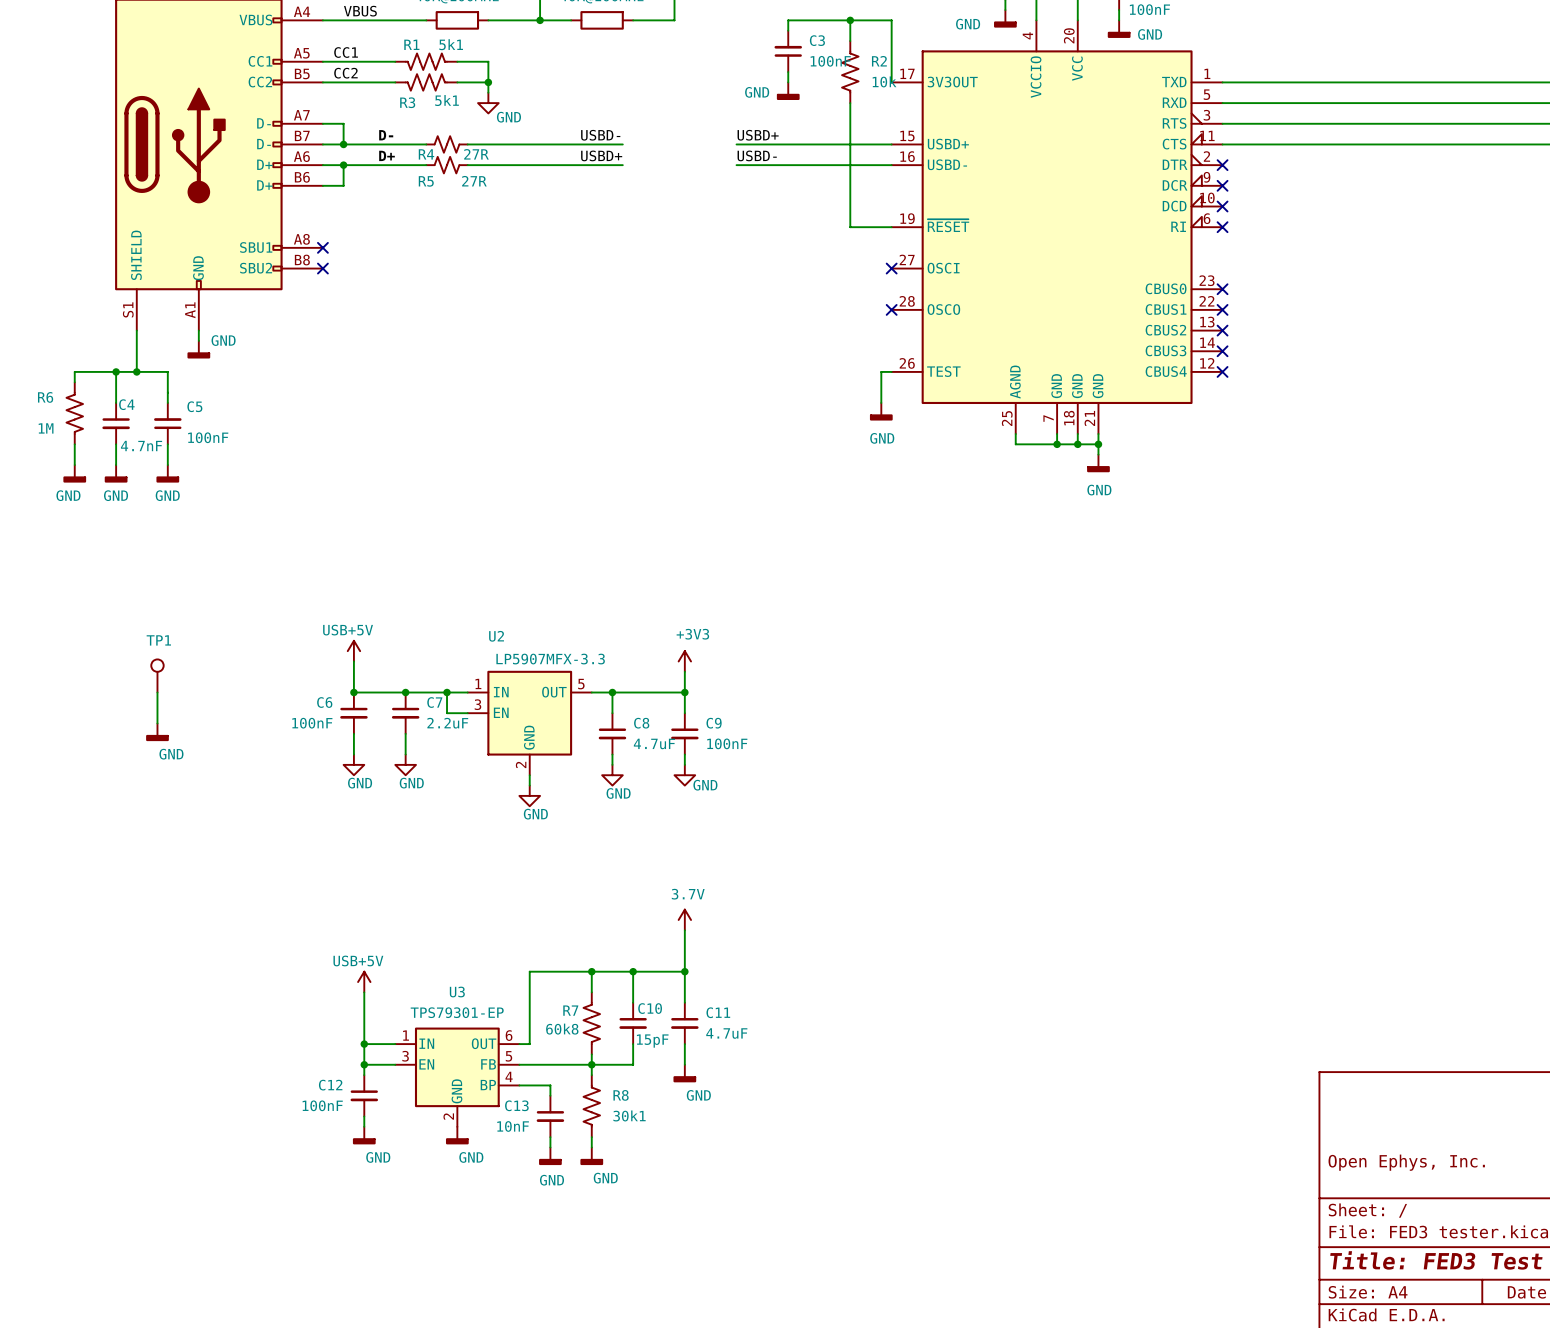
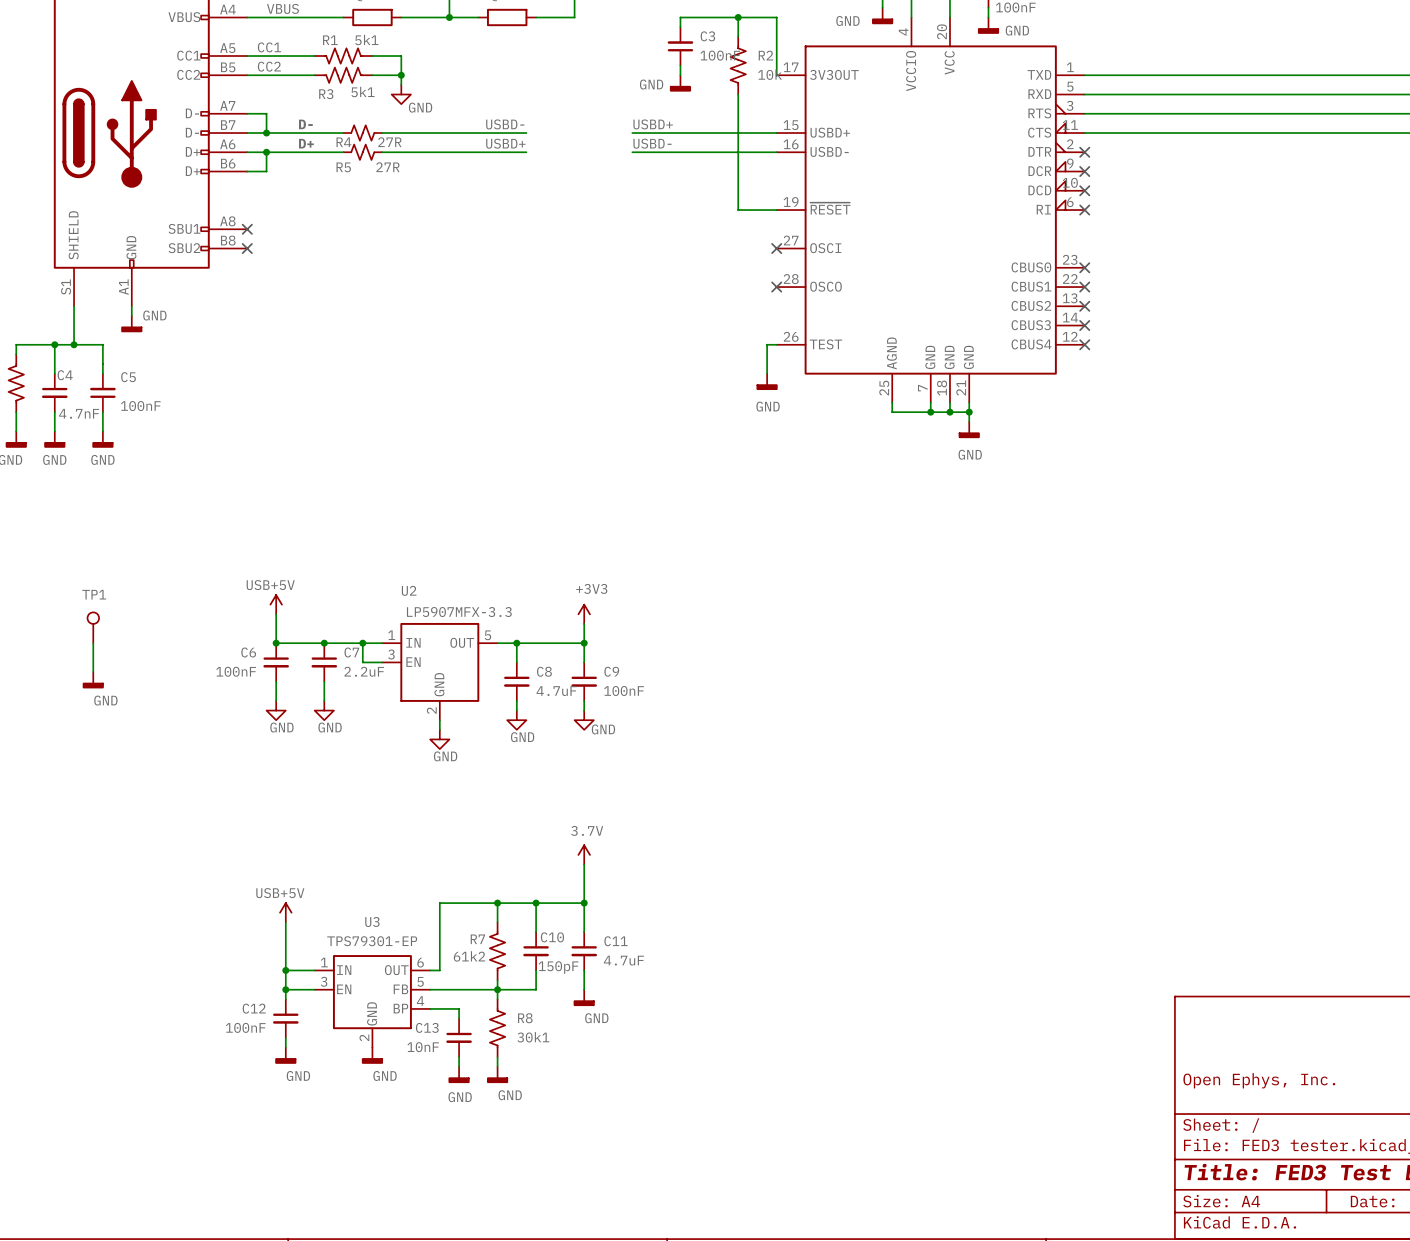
R7 value: 60k8 (562, 1029) -> 61k2 (469, 956)
C10 value: 15pF (652, 1041) -> 150pF (558, 967)

